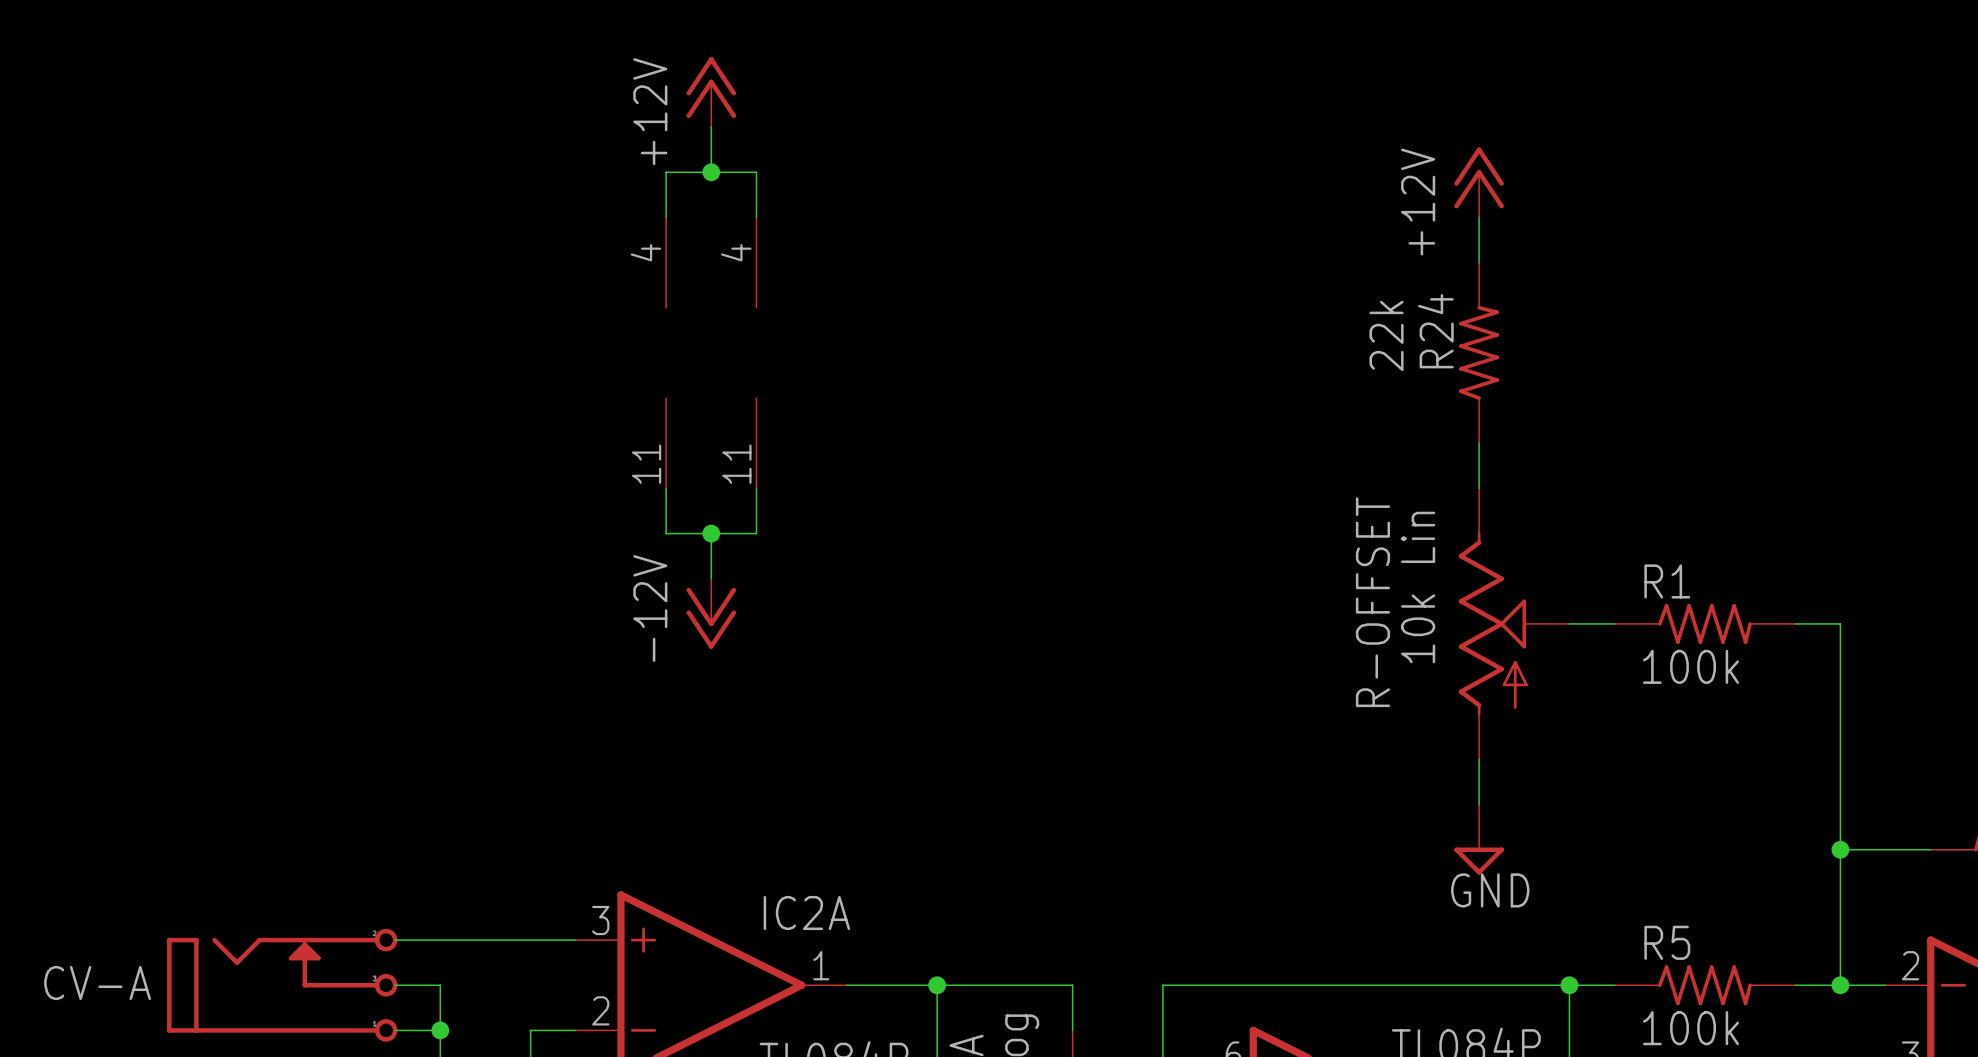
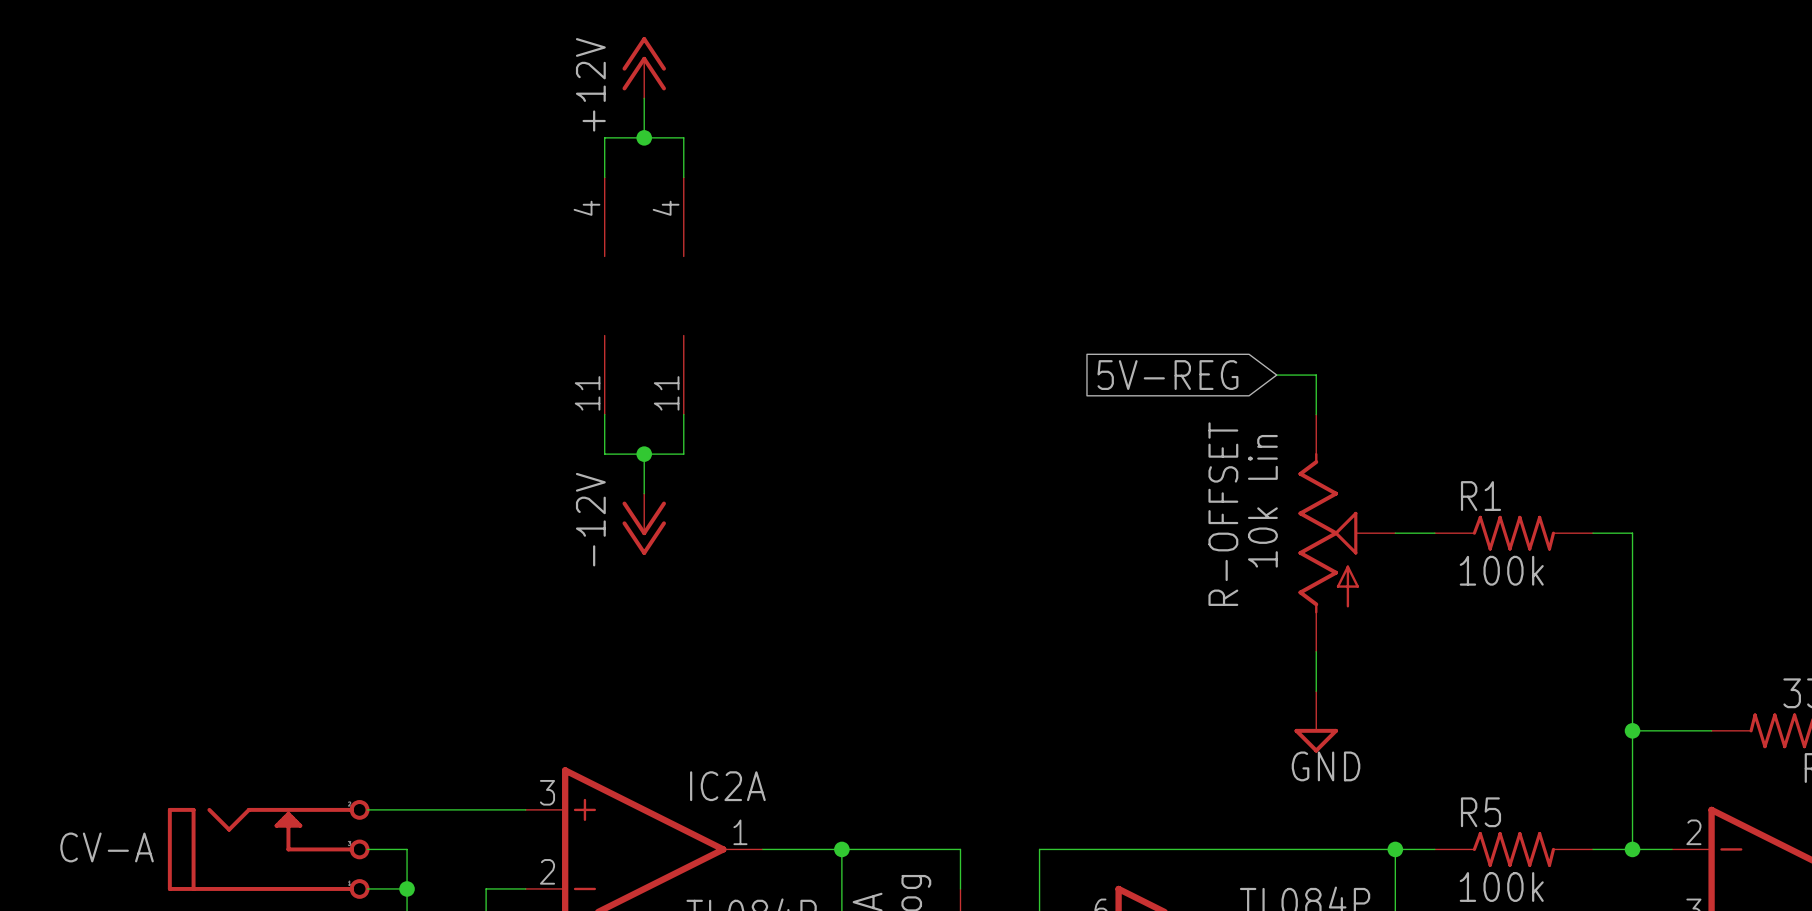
power symbol: +12V (1479, 182) -> none
wire: (1479, 217) (1479, 262) -> none
R24: 22k (1479, 352) -> none
global label: none -> 5V-REG (1167, 375)
wire: none -> (1276, 375) (1316, 375)

